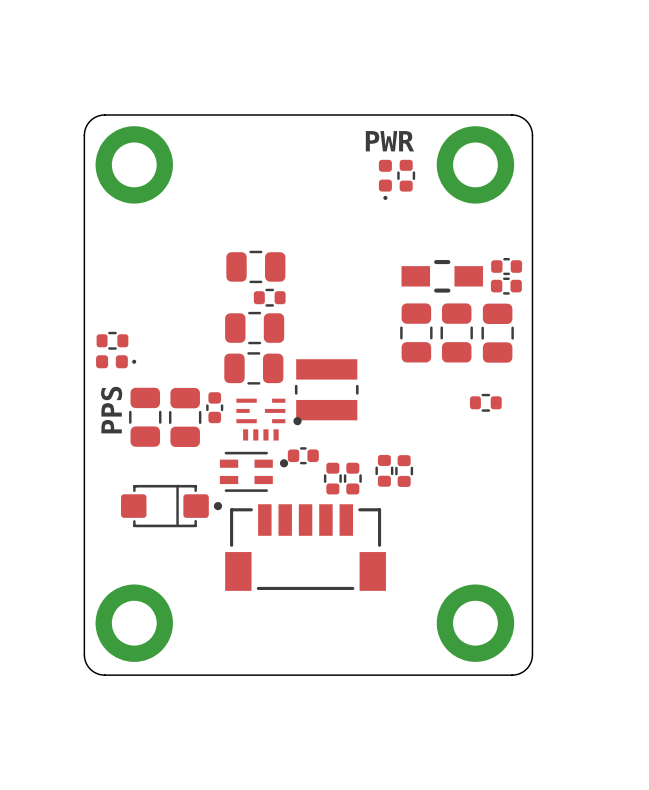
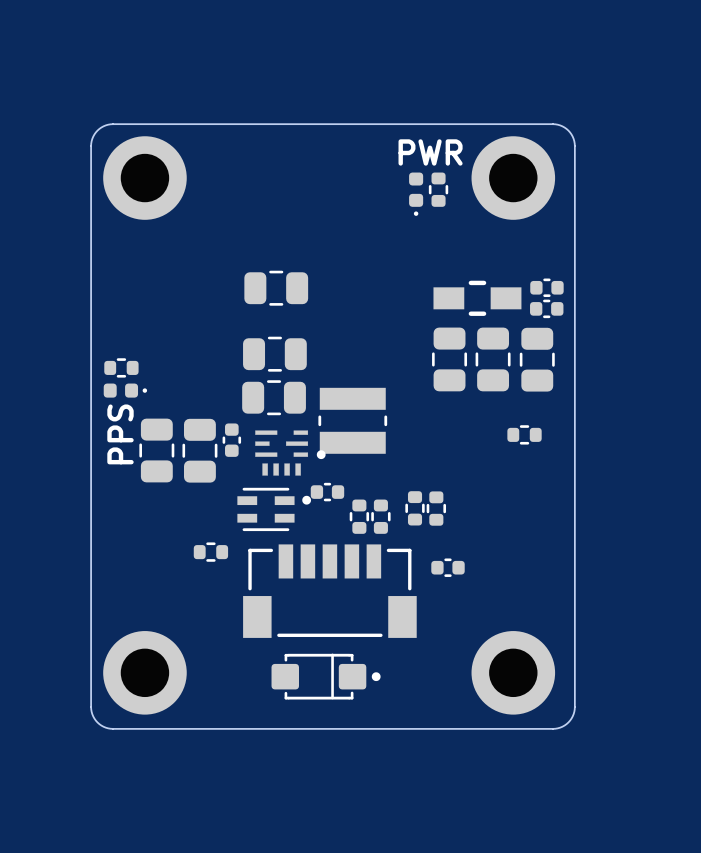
part position: (269, 297) -> (210, 552)
part position: (171, 505) -> (326, 676)
part: none -> (447, 567)

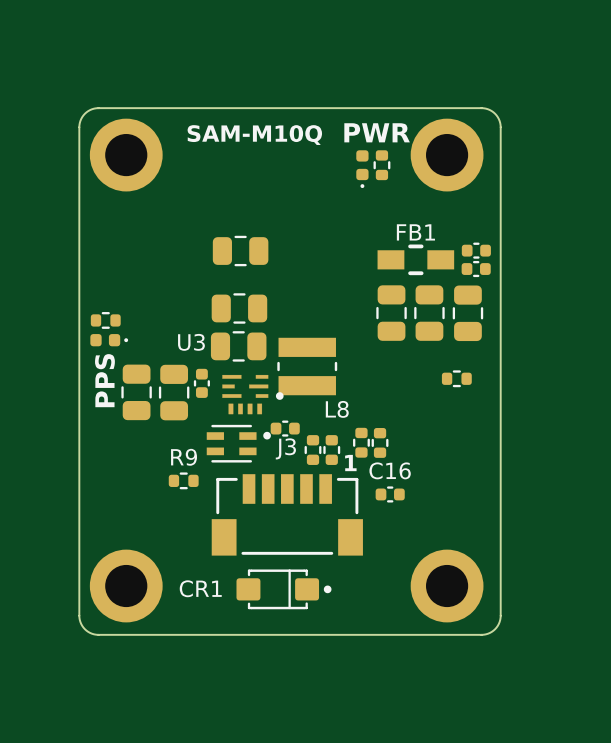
text: none -> SAM-M10Q (254, 135)
FB1 name: none -> FB1 (415, 232)
U3 name: none -> U3 (191, 342)
L8 name: none -> L8 (337, 409)
J3 name: none -> J3 (285, 448)
R9 name: none -> R9 (184, 457)
text: none -> 1 (350, 463)
C16 name: none -> C16 (390, 470)
CR1 name: none -> CR1 (200, 588)

